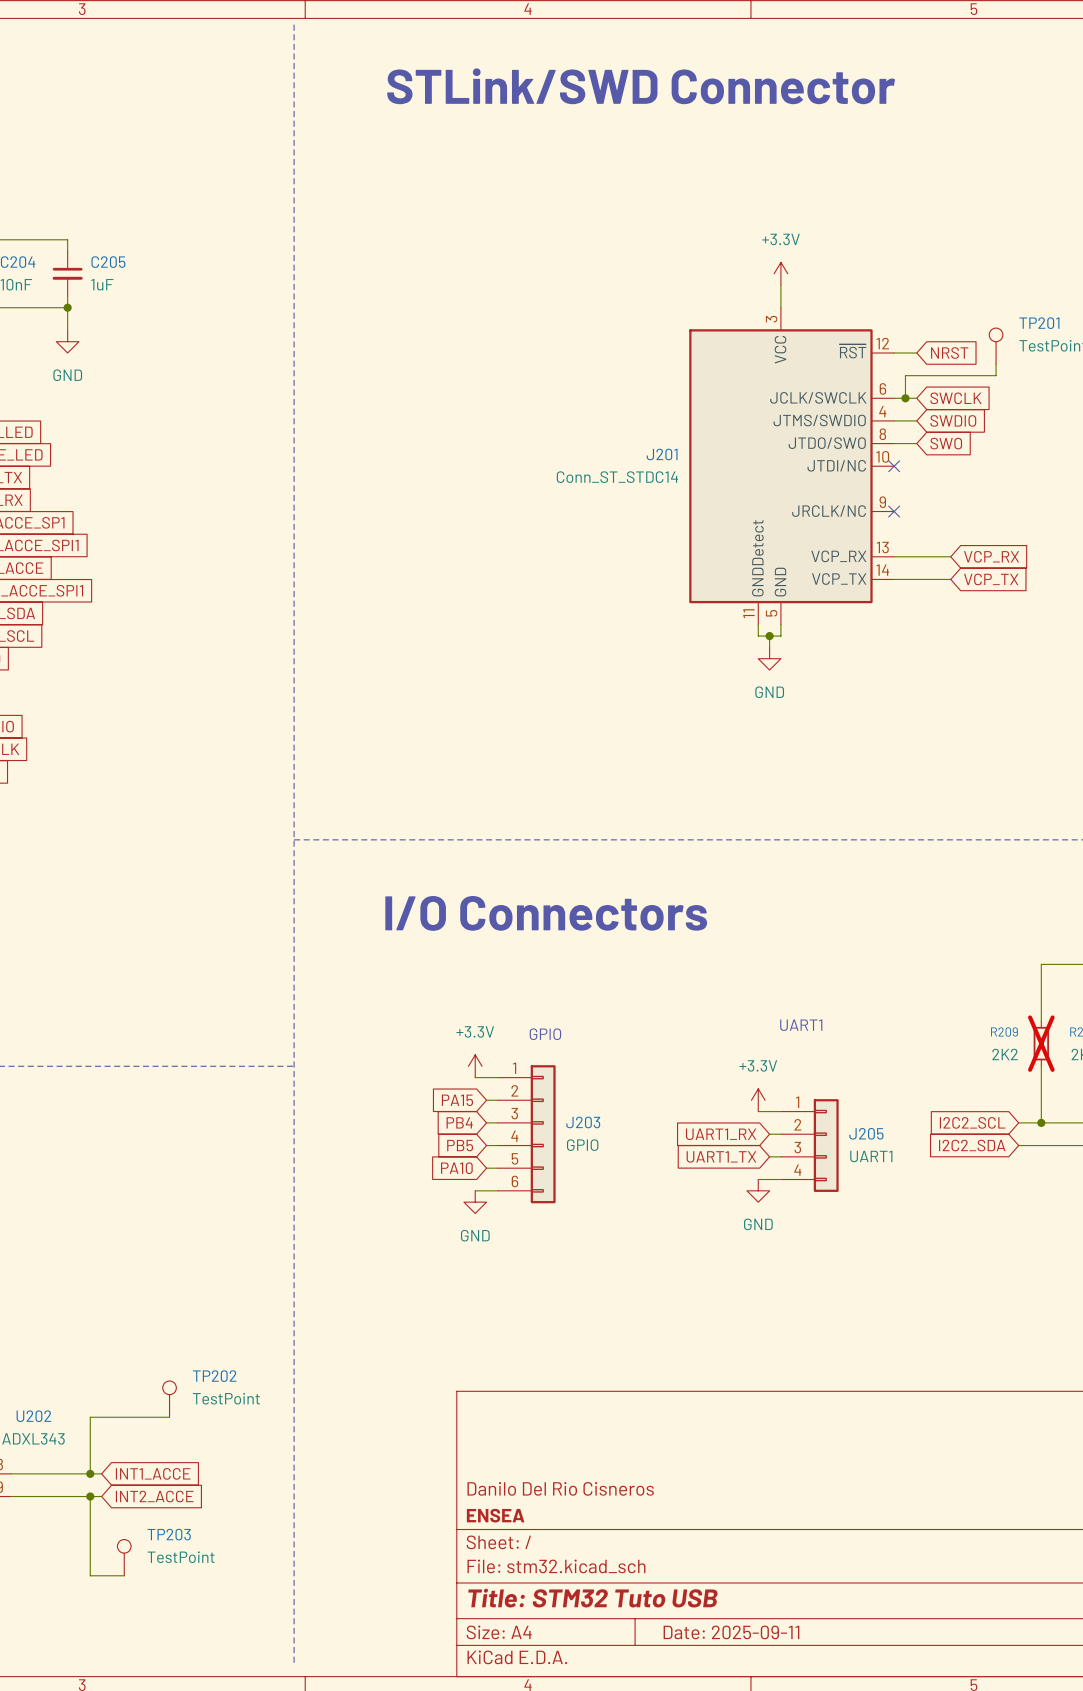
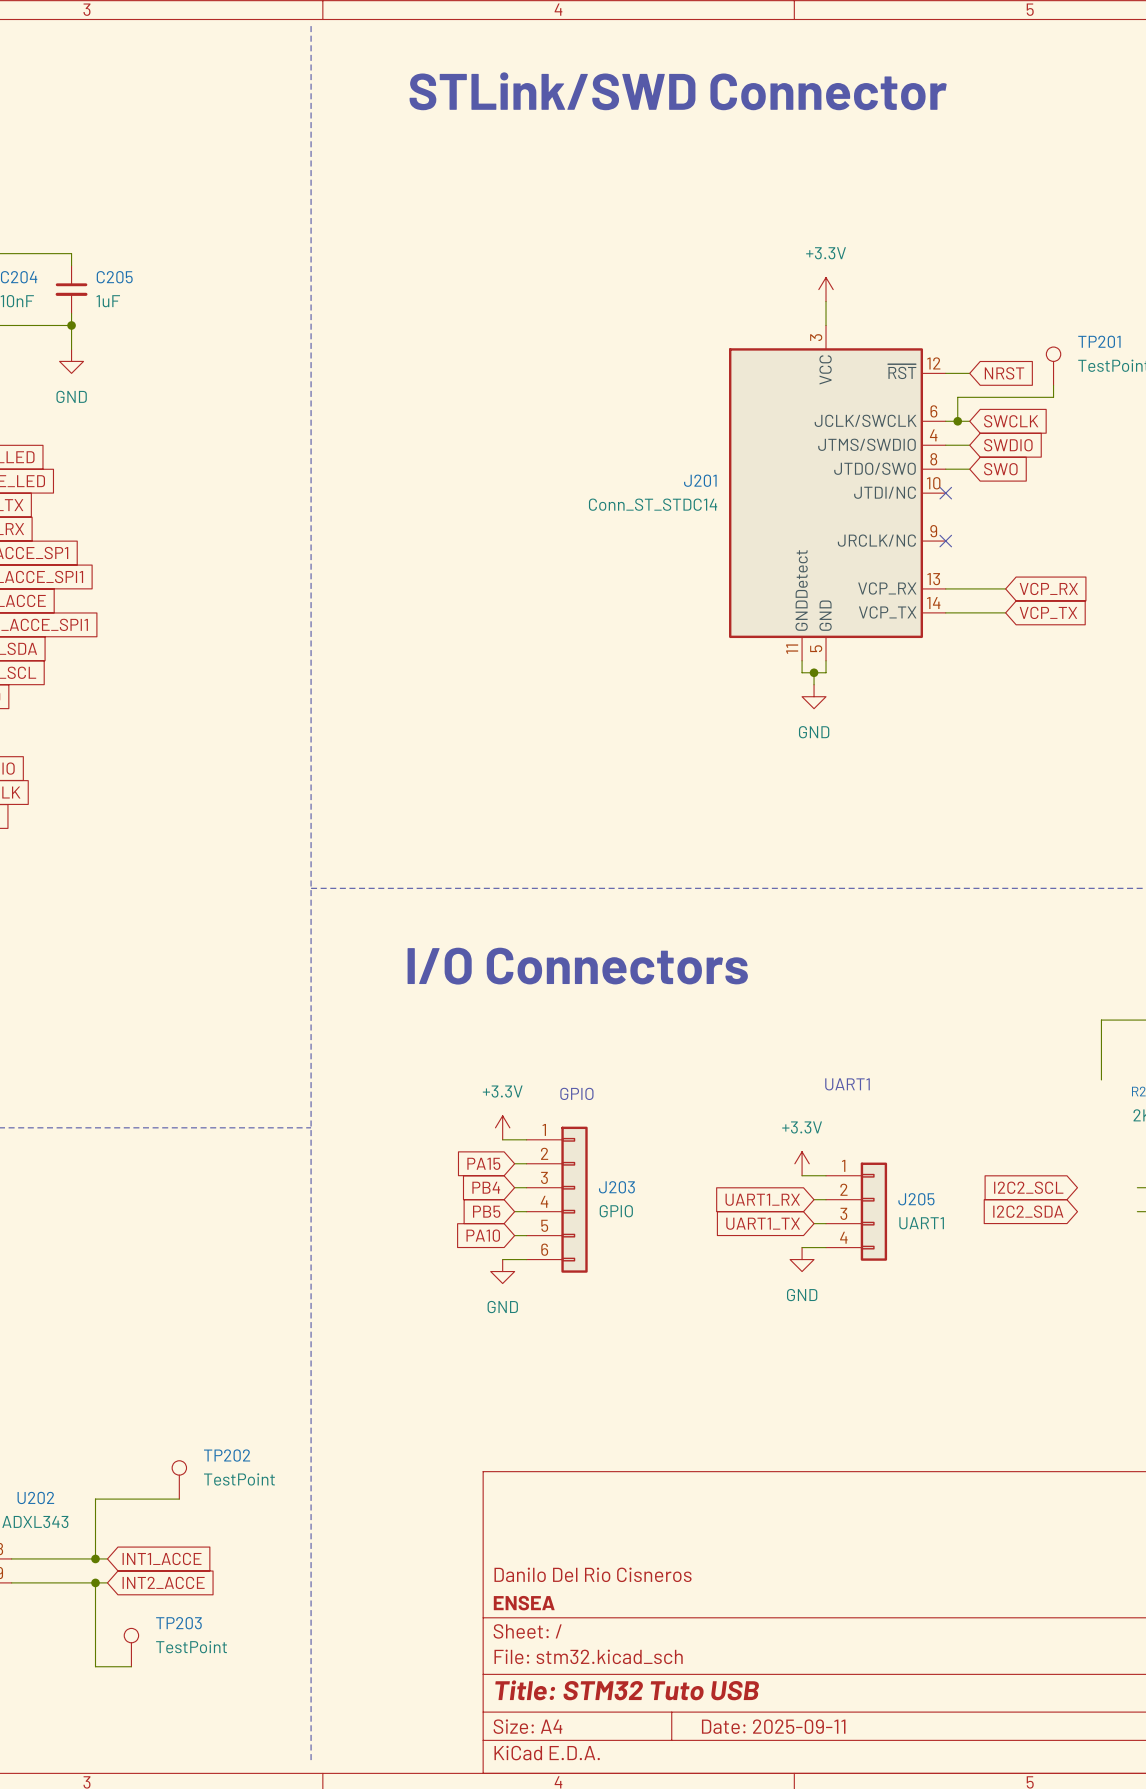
R209: 2K2 (1041, 1043) -> none
wire: (1041, 1066) (1041, 1122) -> none
wire: (1018, 1122) (1075, 1122) -> none
junction: (1041, 1122) -> none
wire: (1018, 1145) (1075, 1145) -> none

